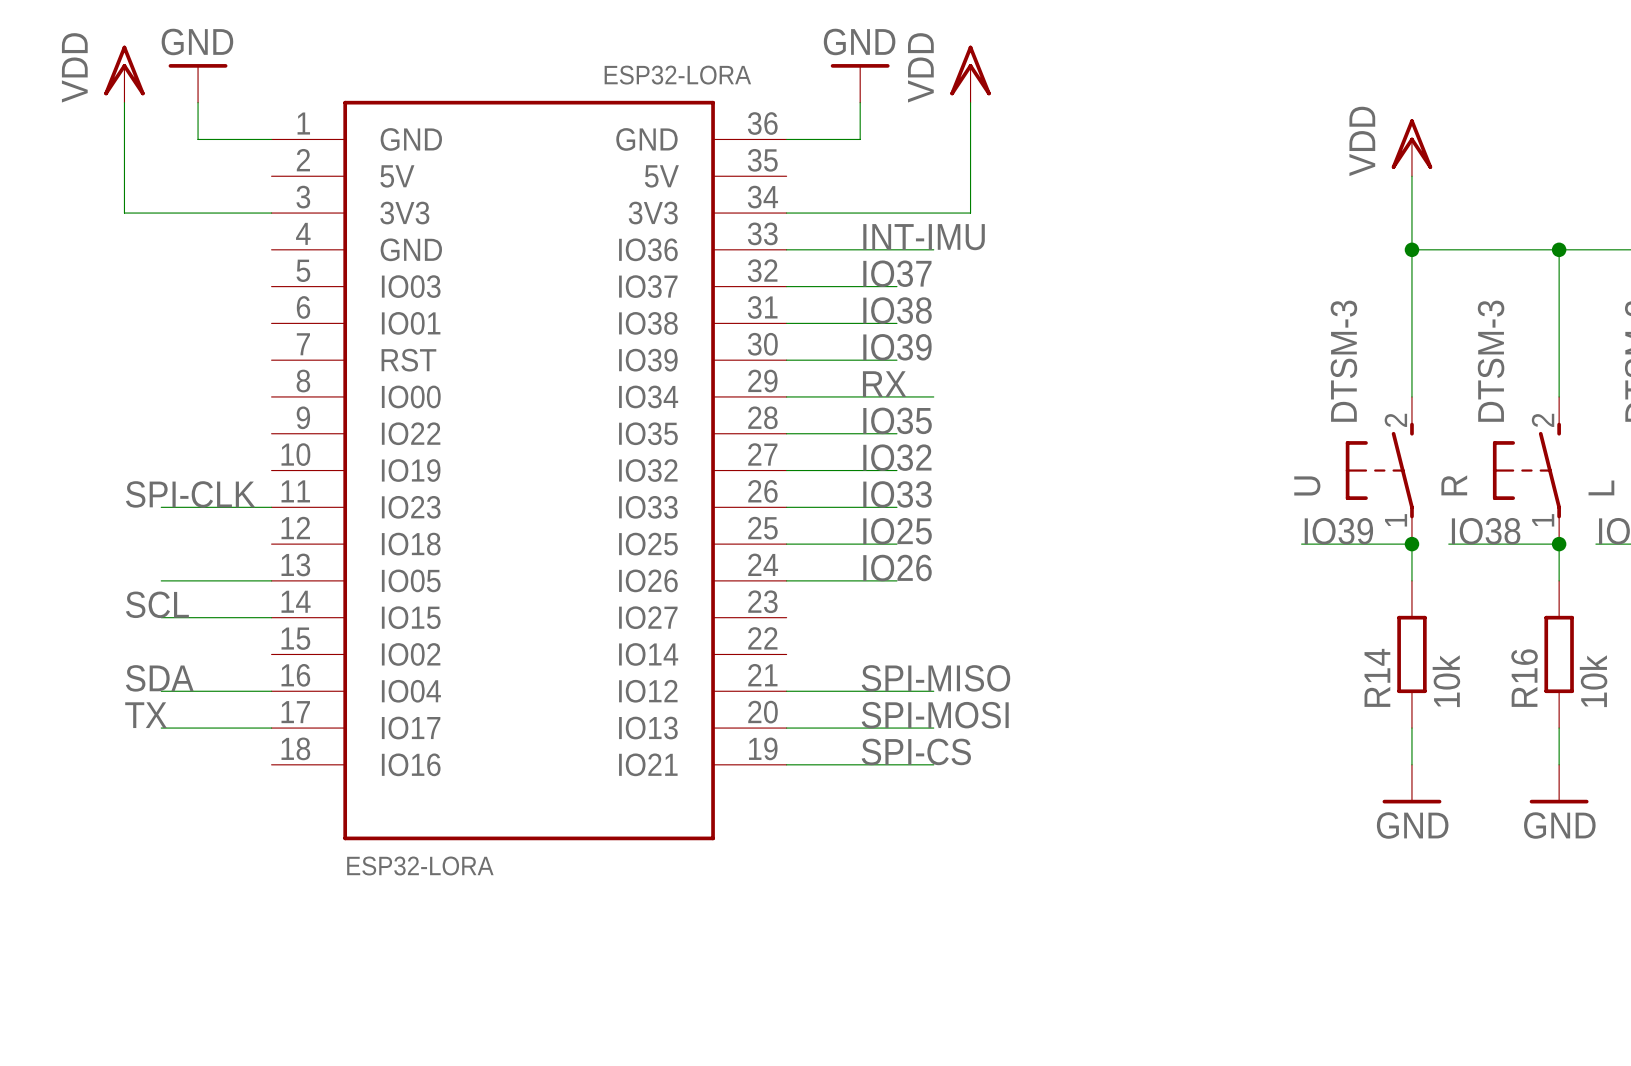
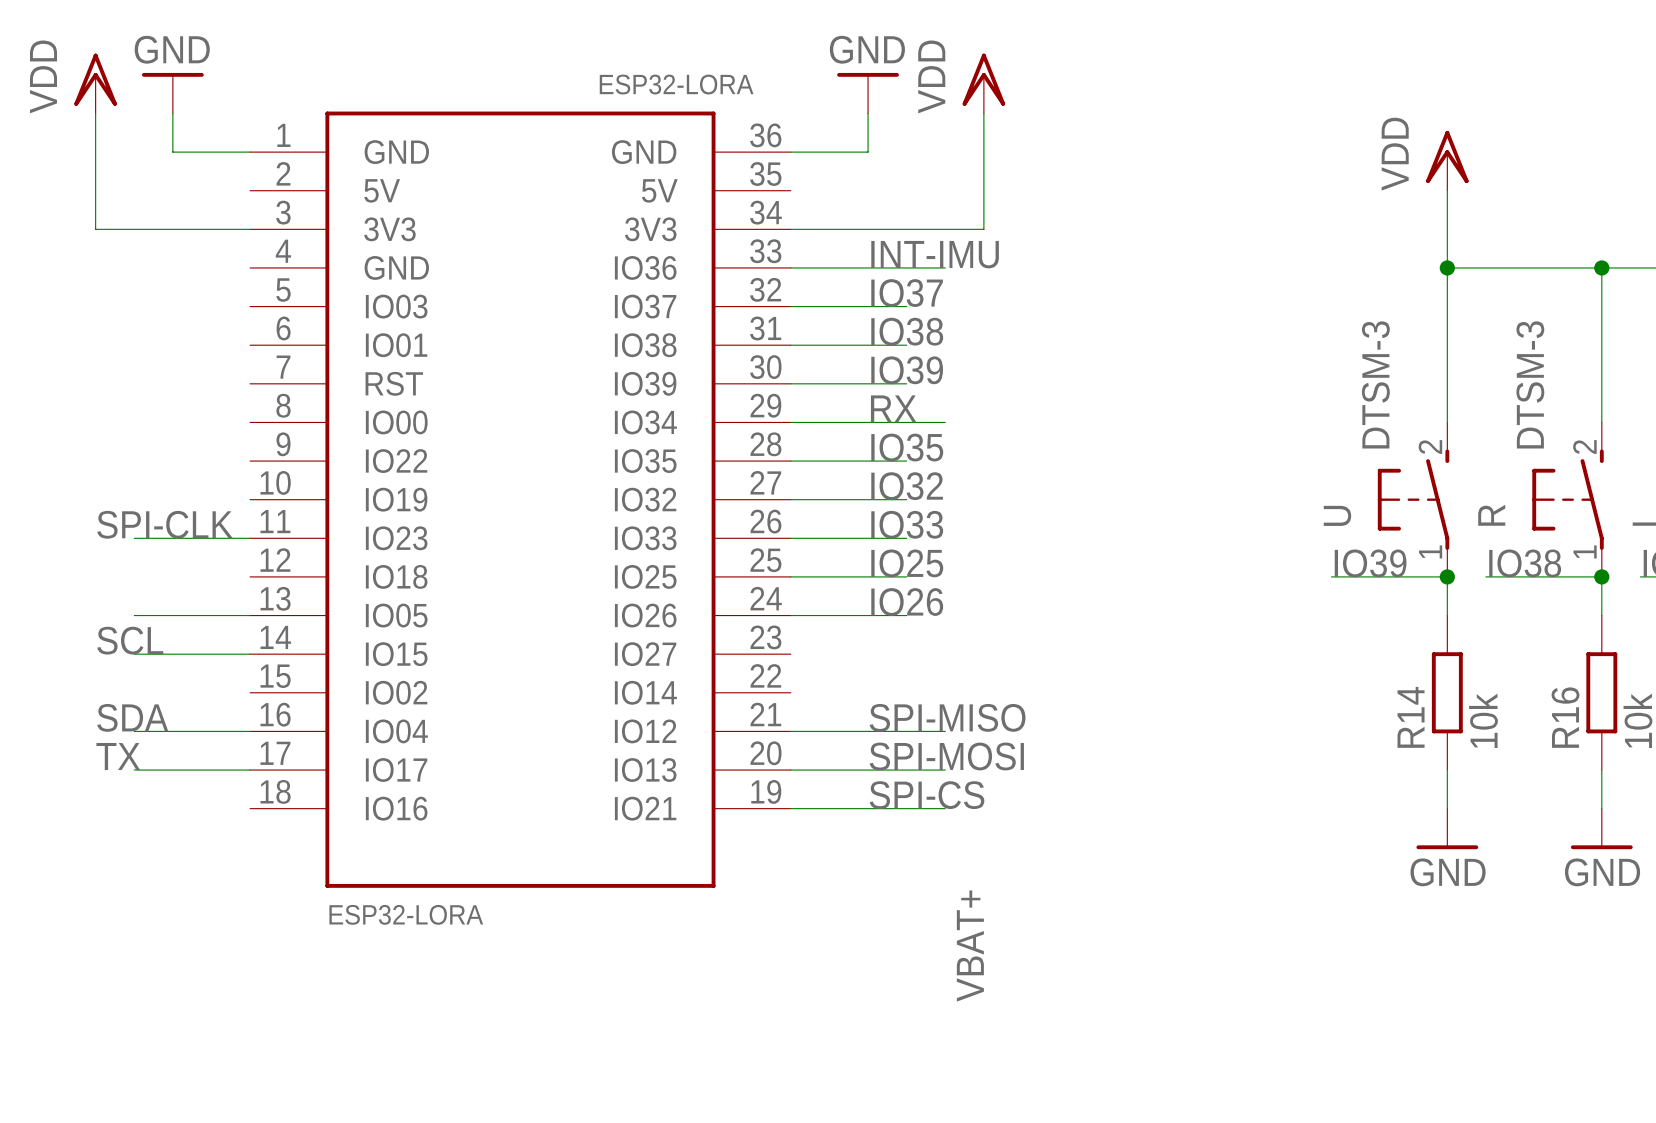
label: none -> VBAT+ (970, 946)

